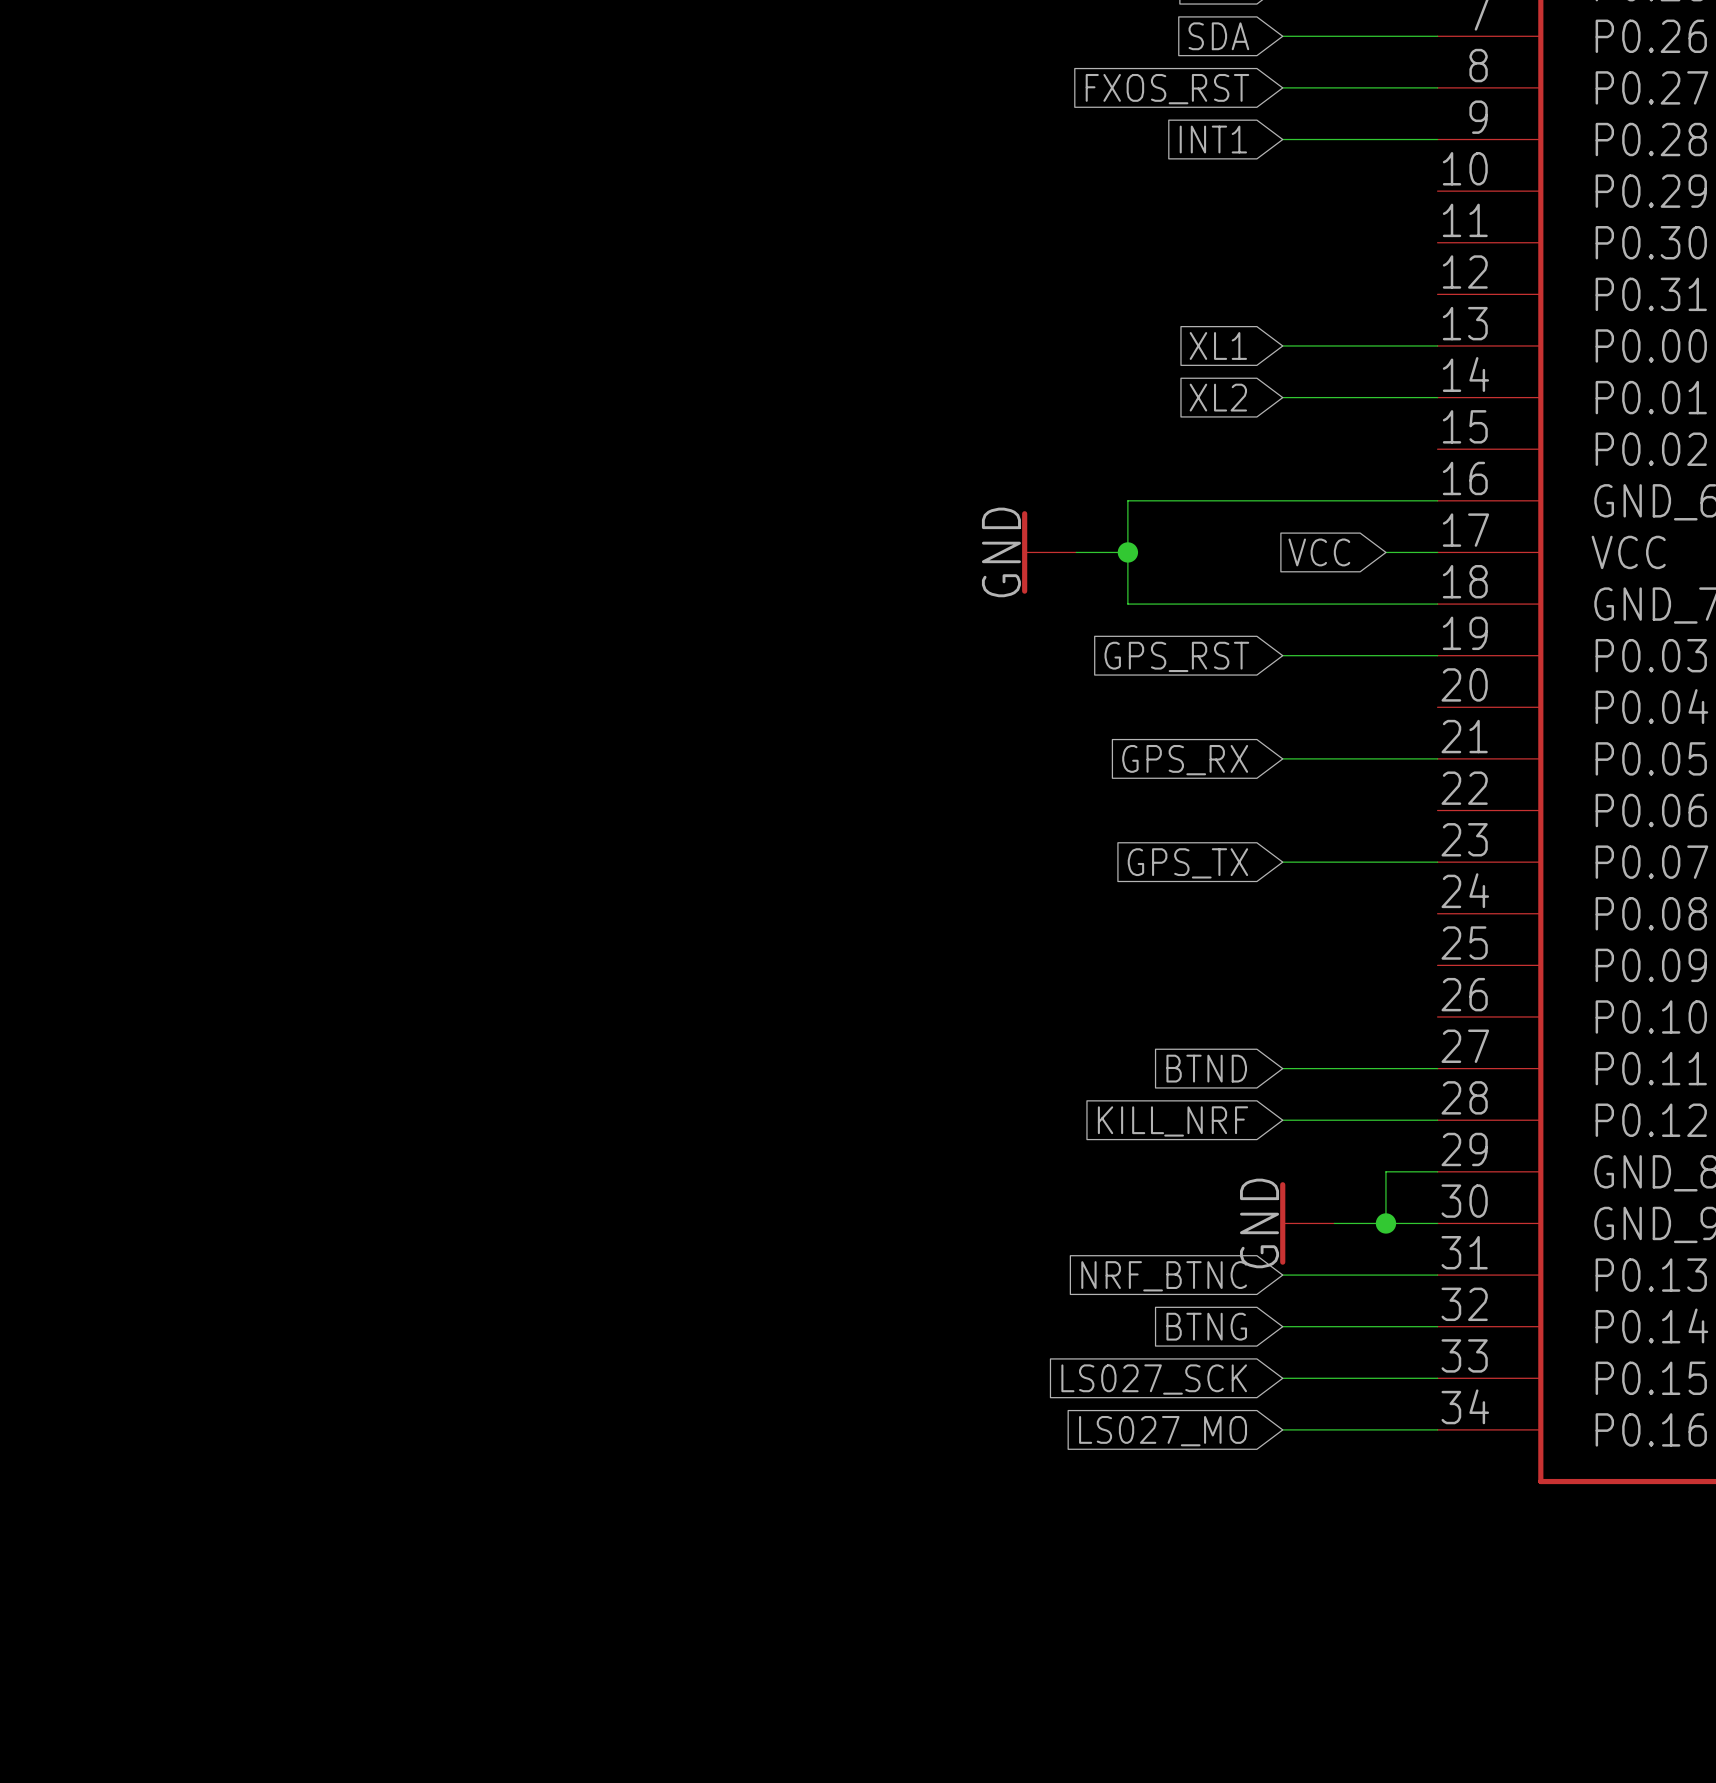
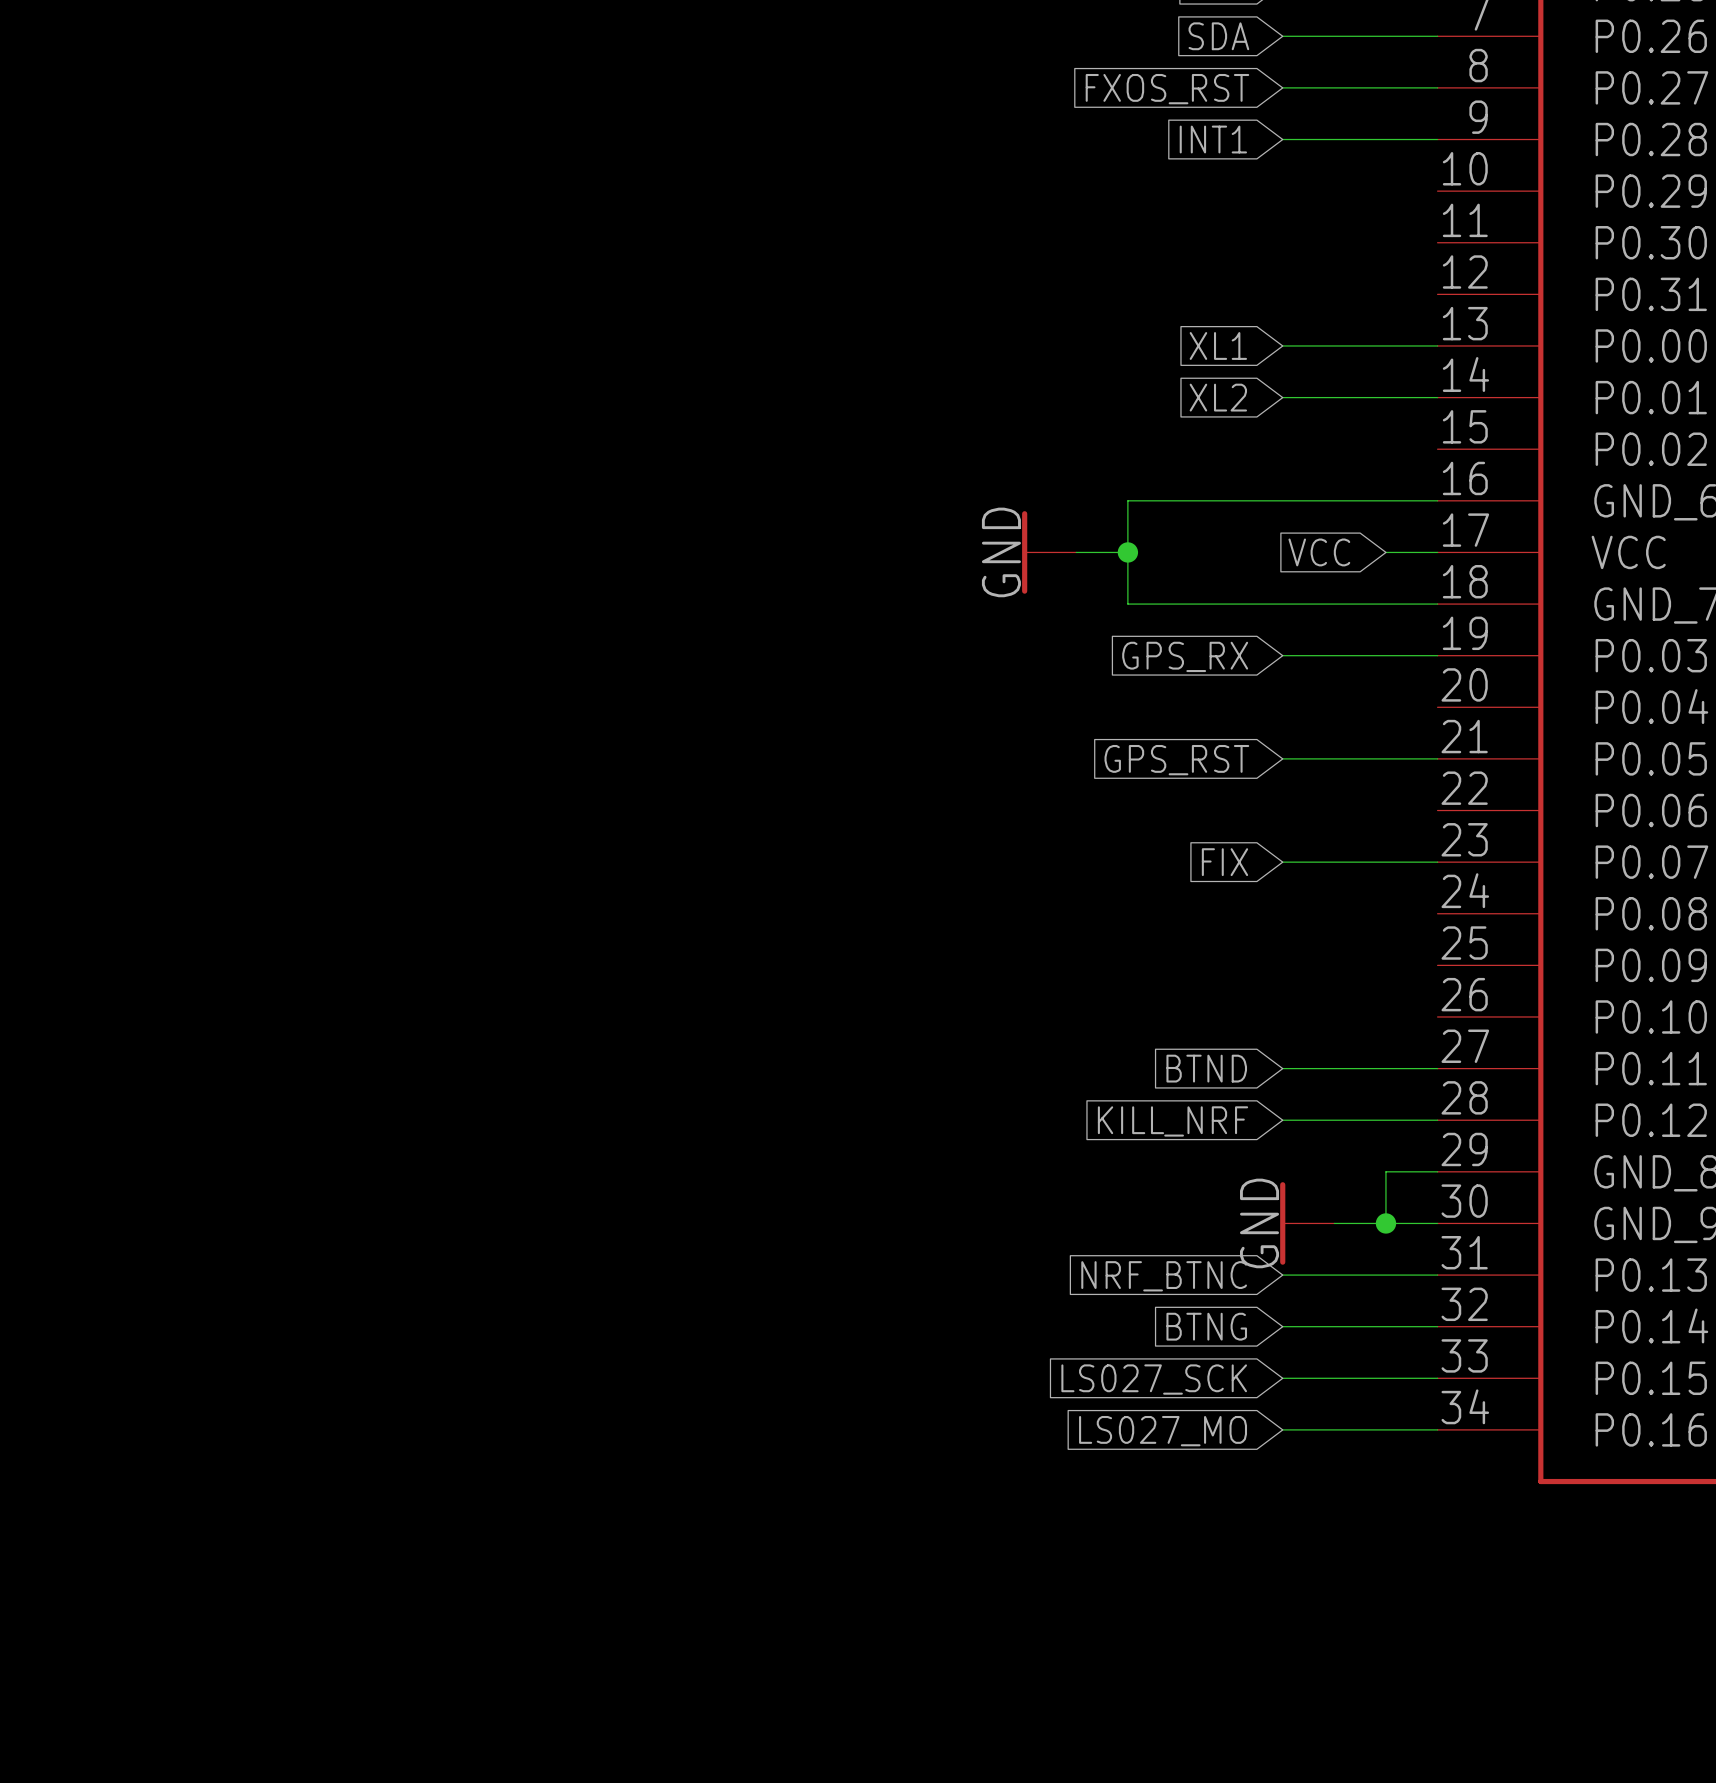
global label: GPS_RST (1176, 656) -> GPS_RX (1185, 656)
global label: GPS_RX (1185, 760) -> GPS_RST (1176, 760)
global label: GPS_TX (1187, 863) -> FIX (1224, 862)

